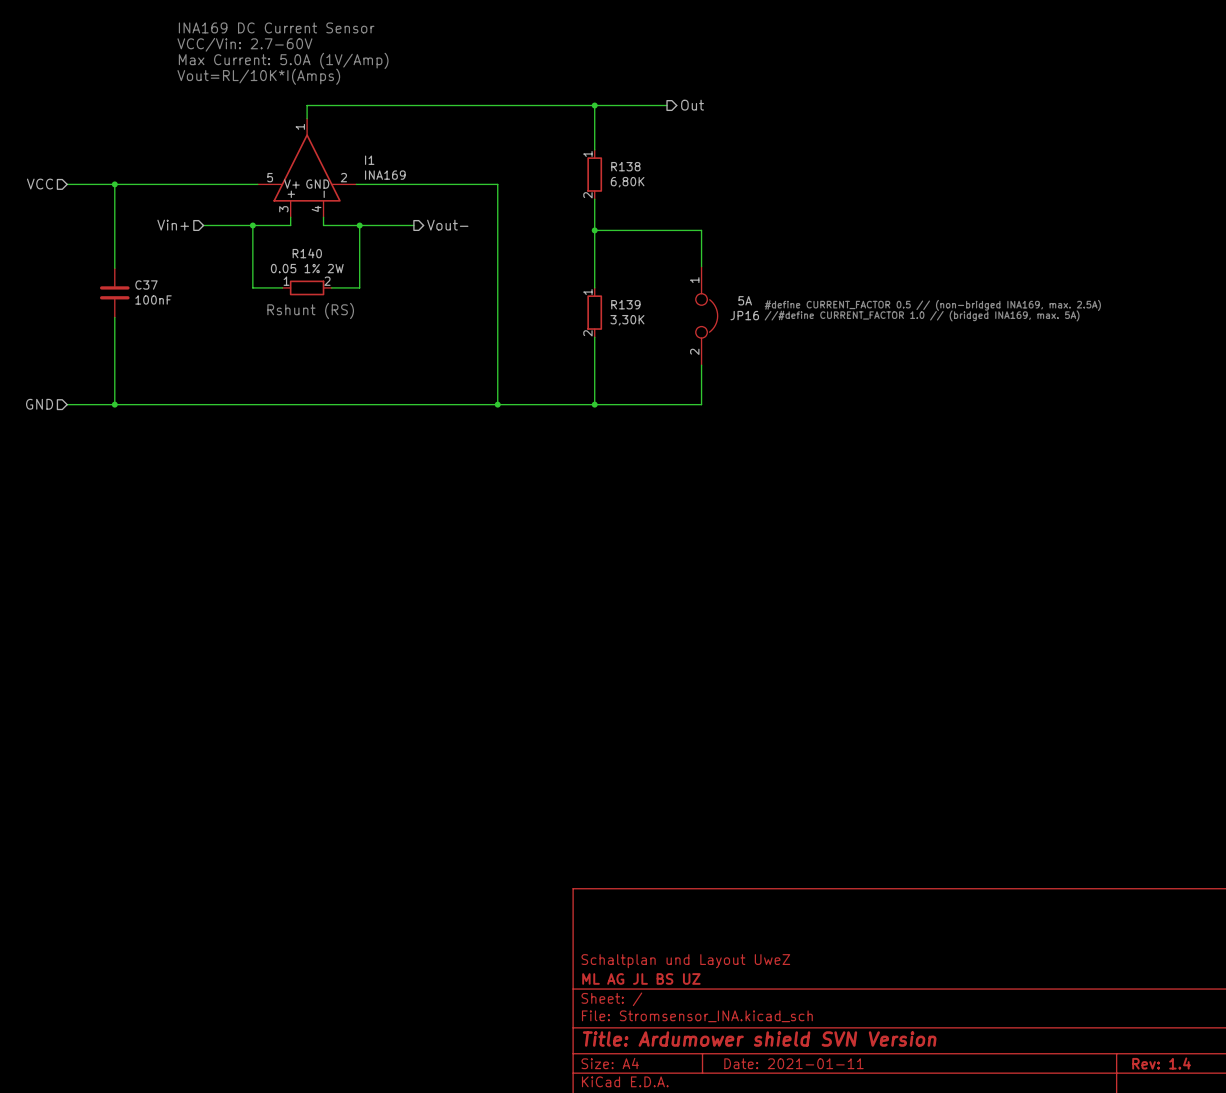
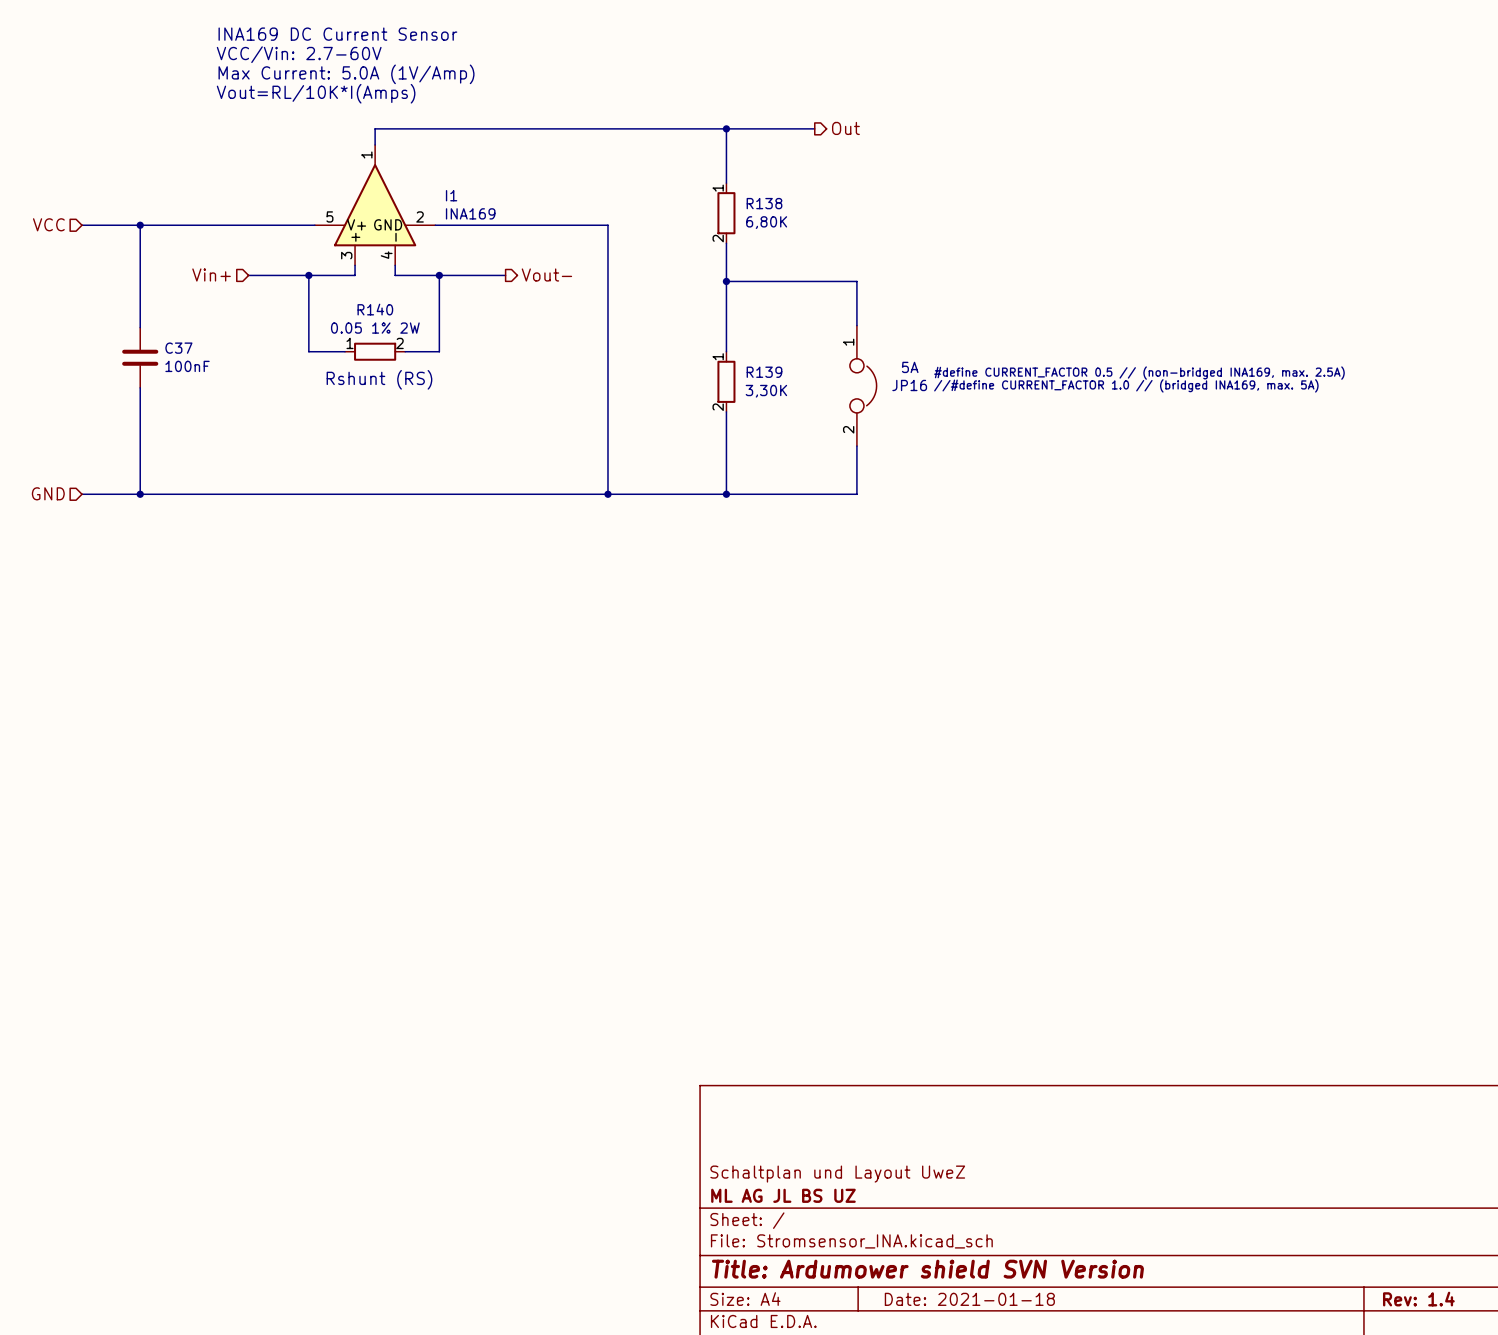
title block: Date: 2021-01-11 (793, 1063) -> Date: 2021-01-18 (969, 1299)

